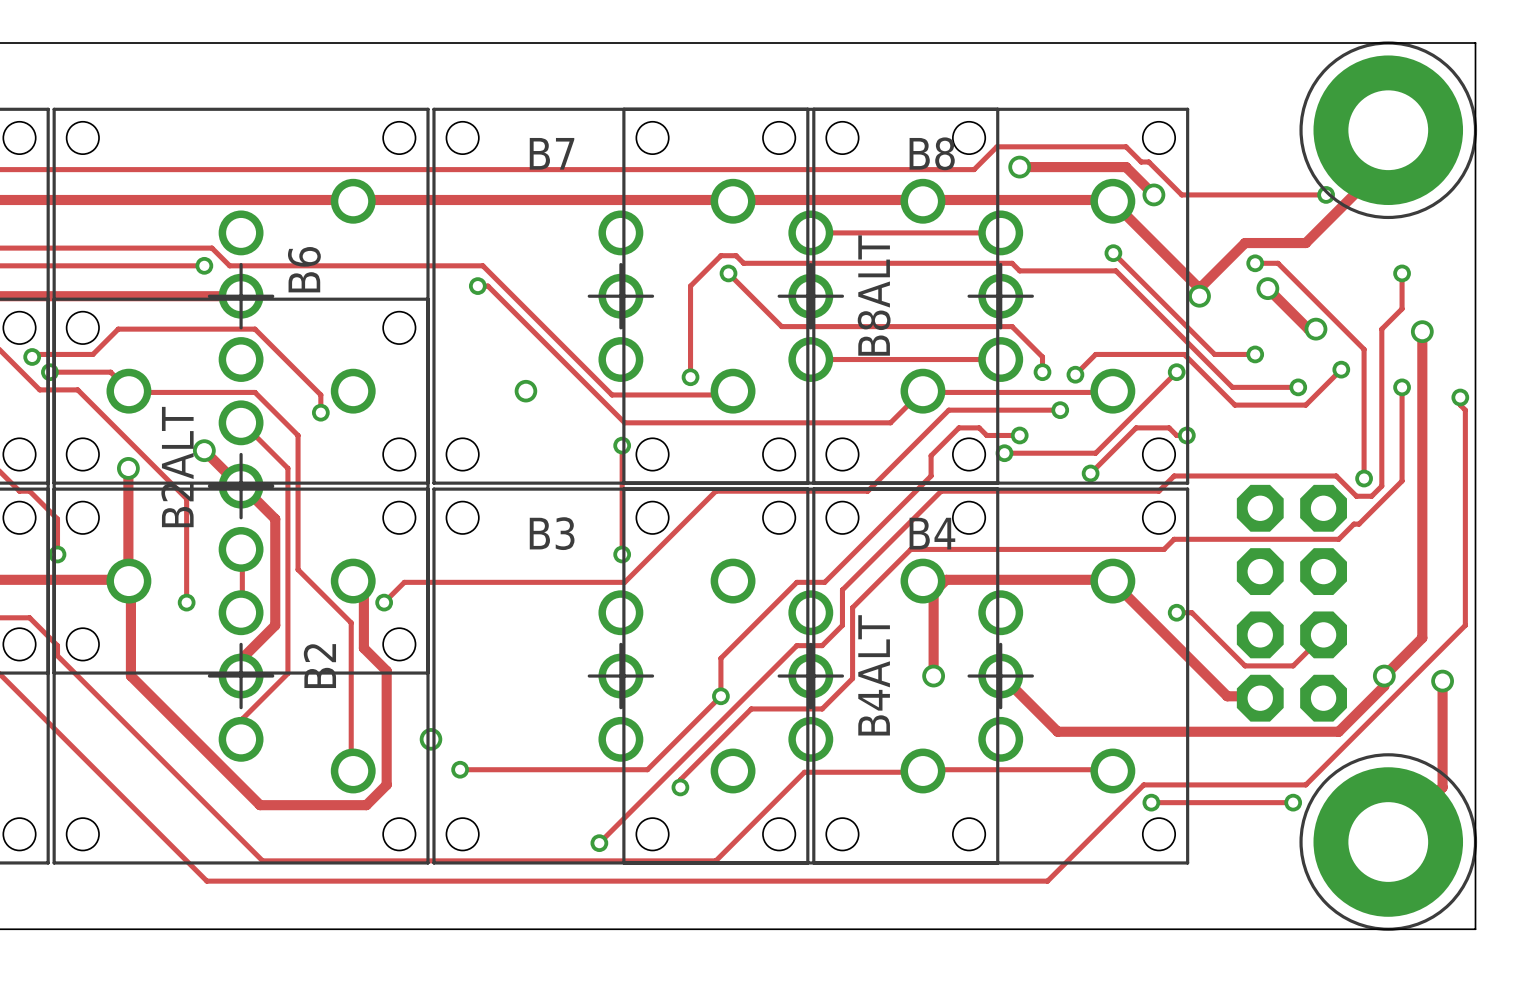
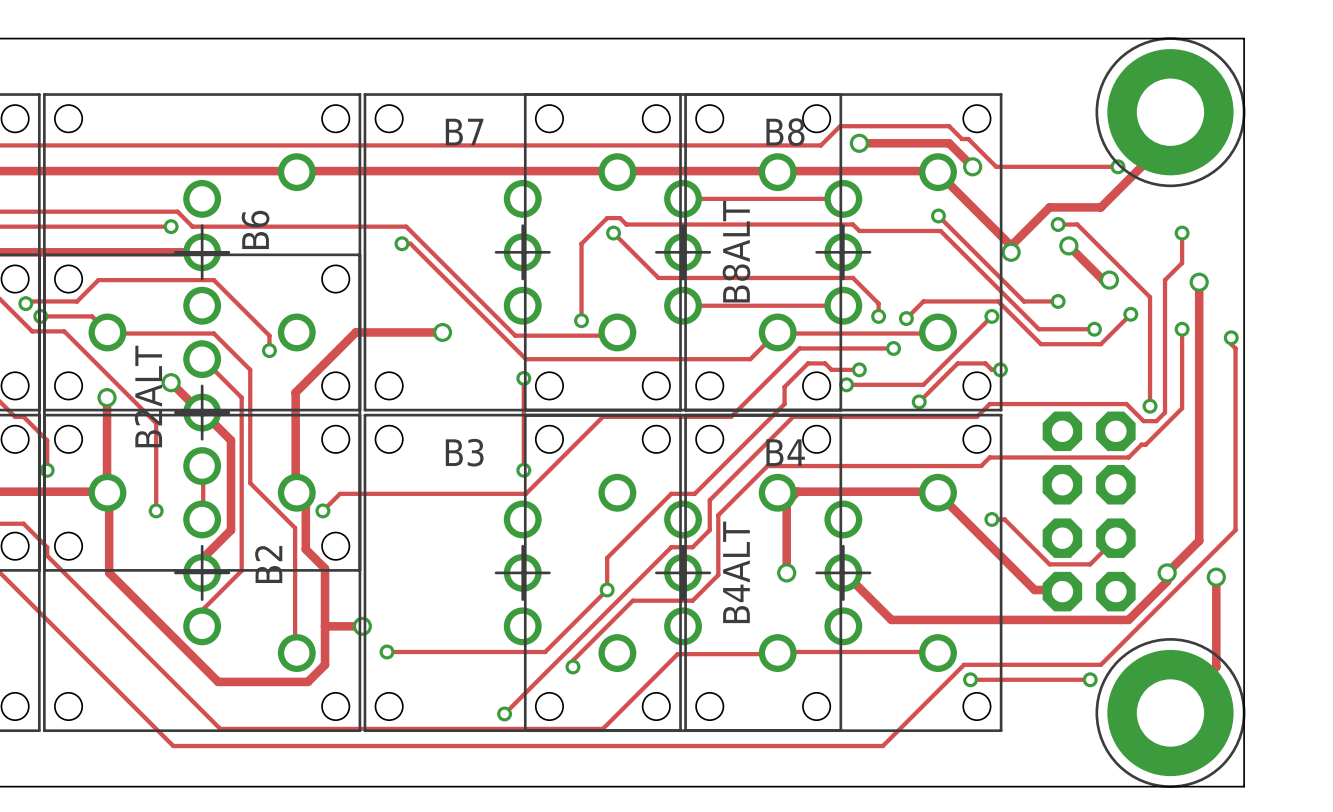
track: none -> (442, 332) (355, 332) (295, 392) (296, 492)
track: none -> (325, 626) (362, 626)

